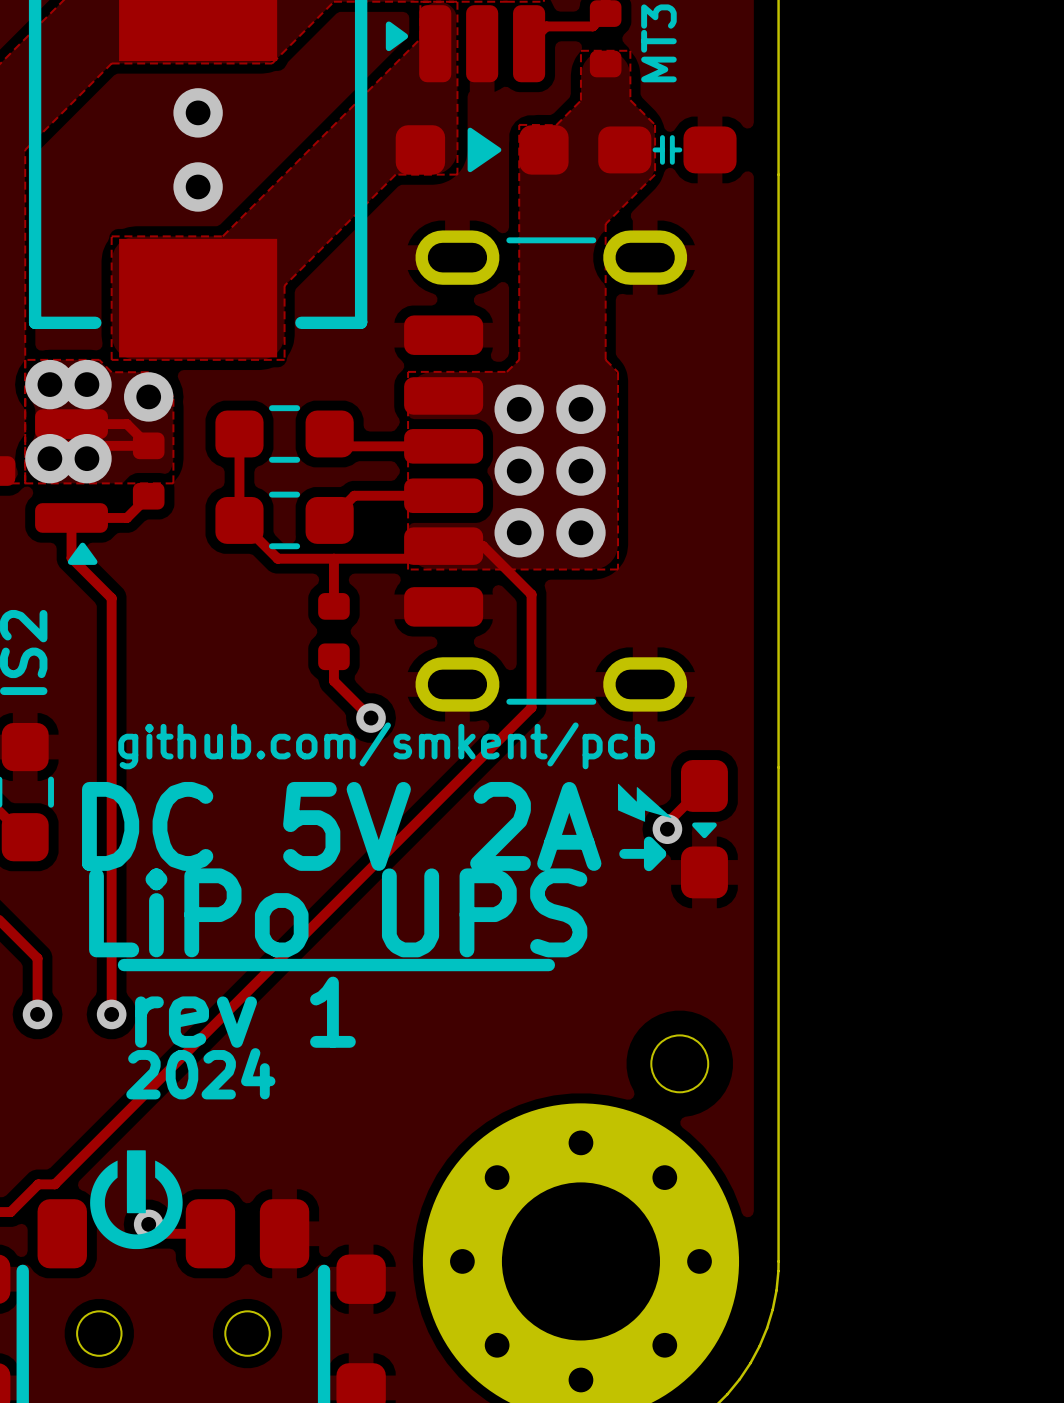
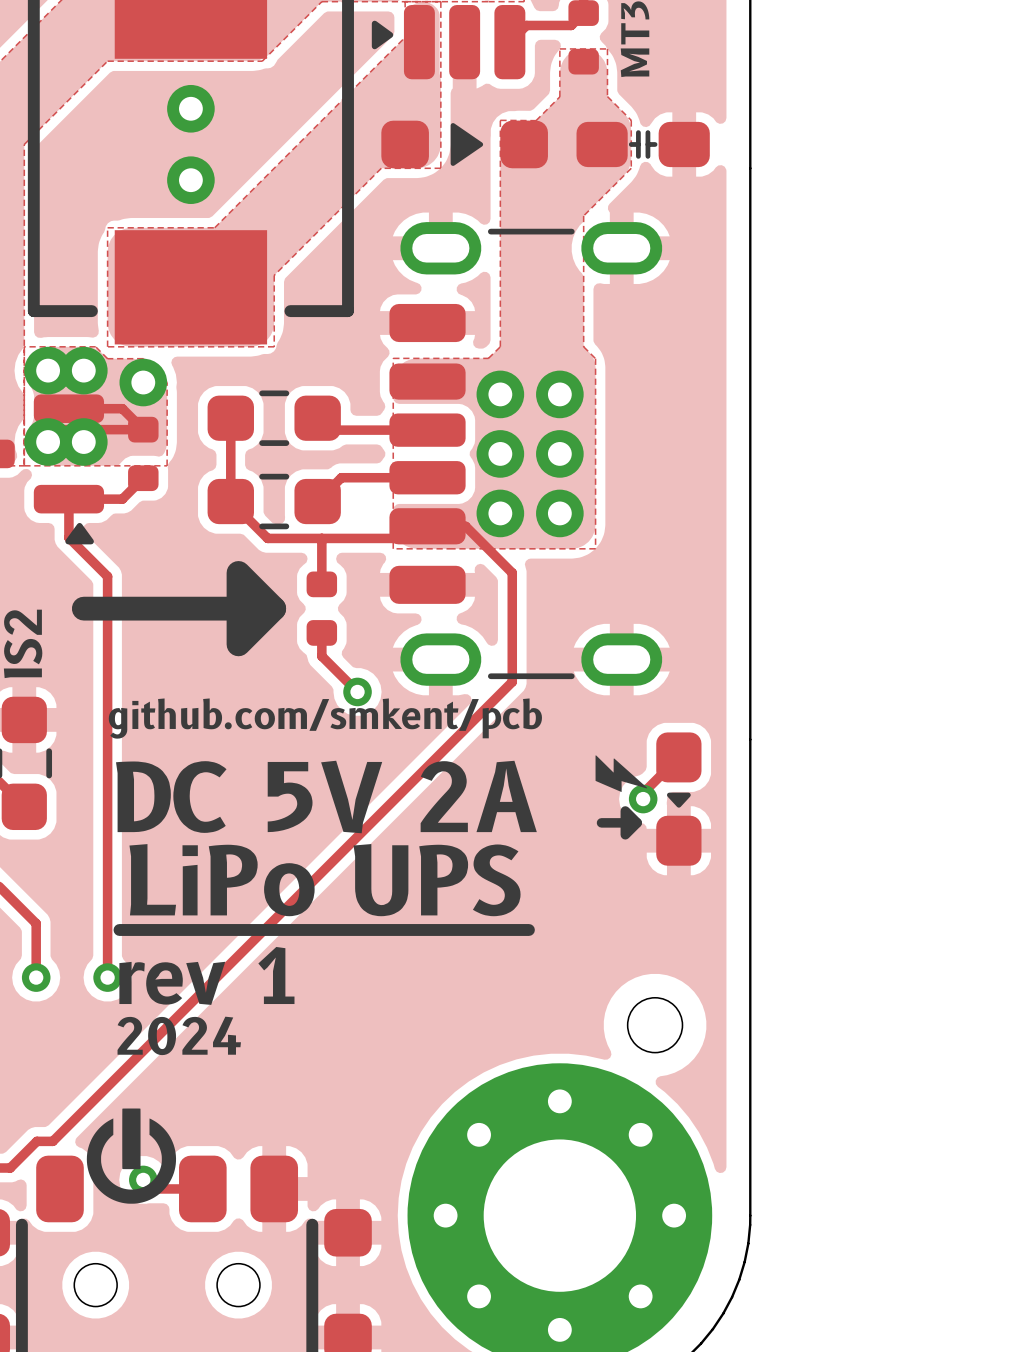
drawing: none -> [226, 561, 287, 657]
line: none -> (83, 608) (274, 608)

